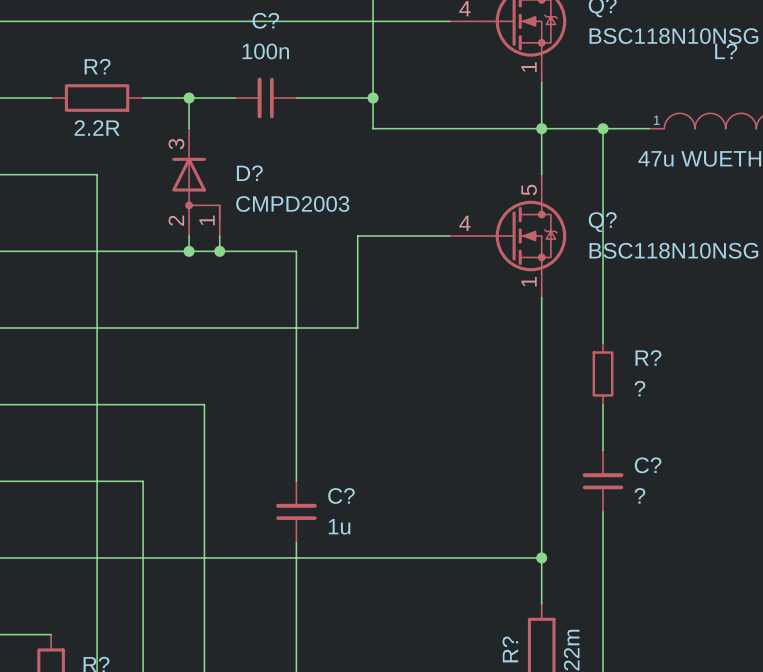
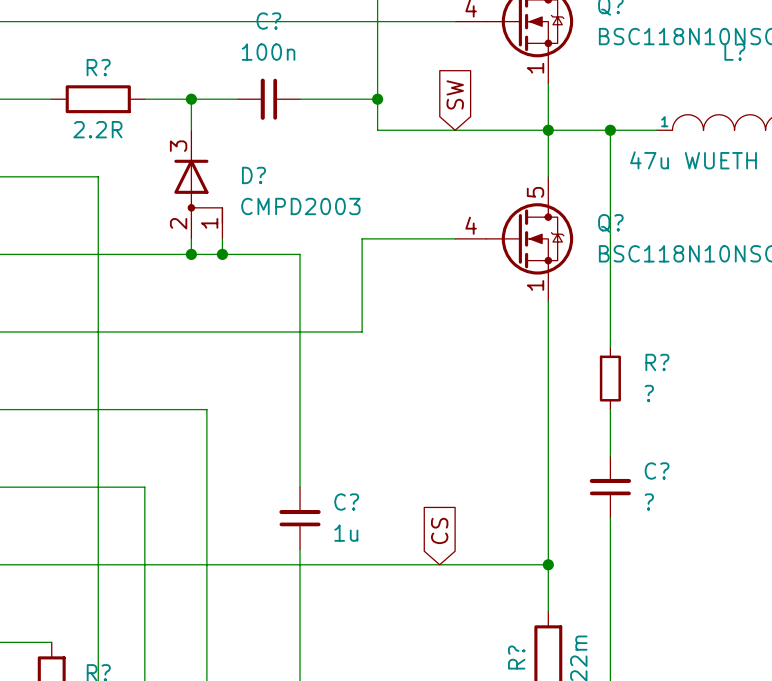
global label: none -> SW (455, 94)
global label: none -> CS (439, 530)

